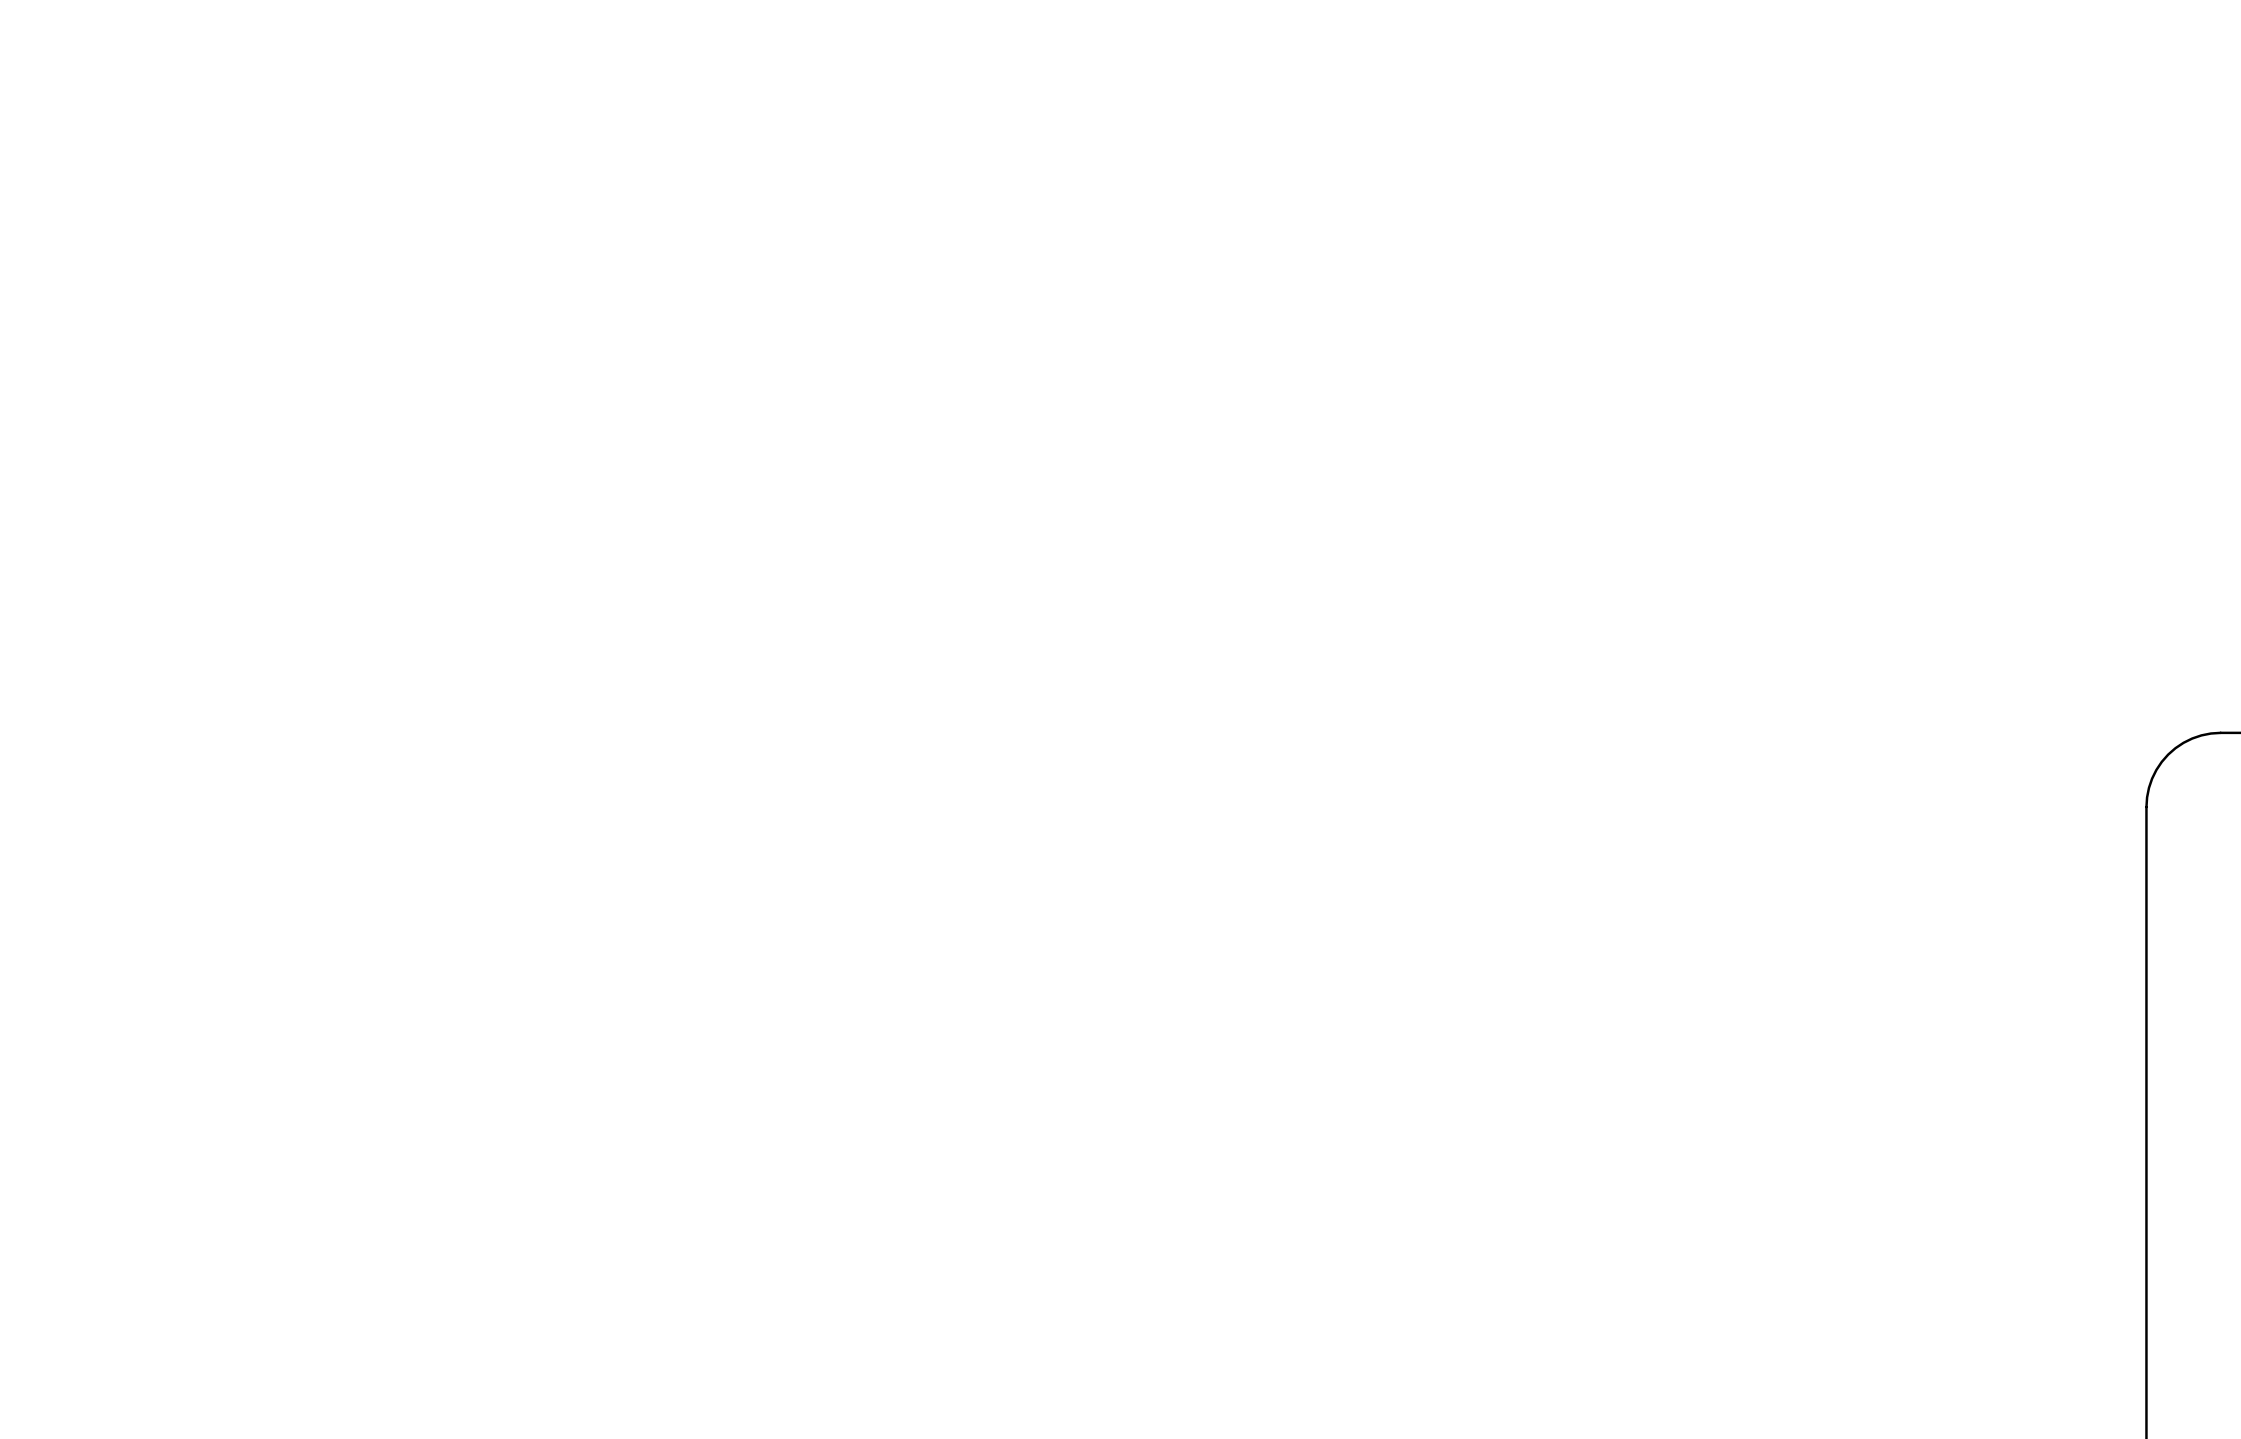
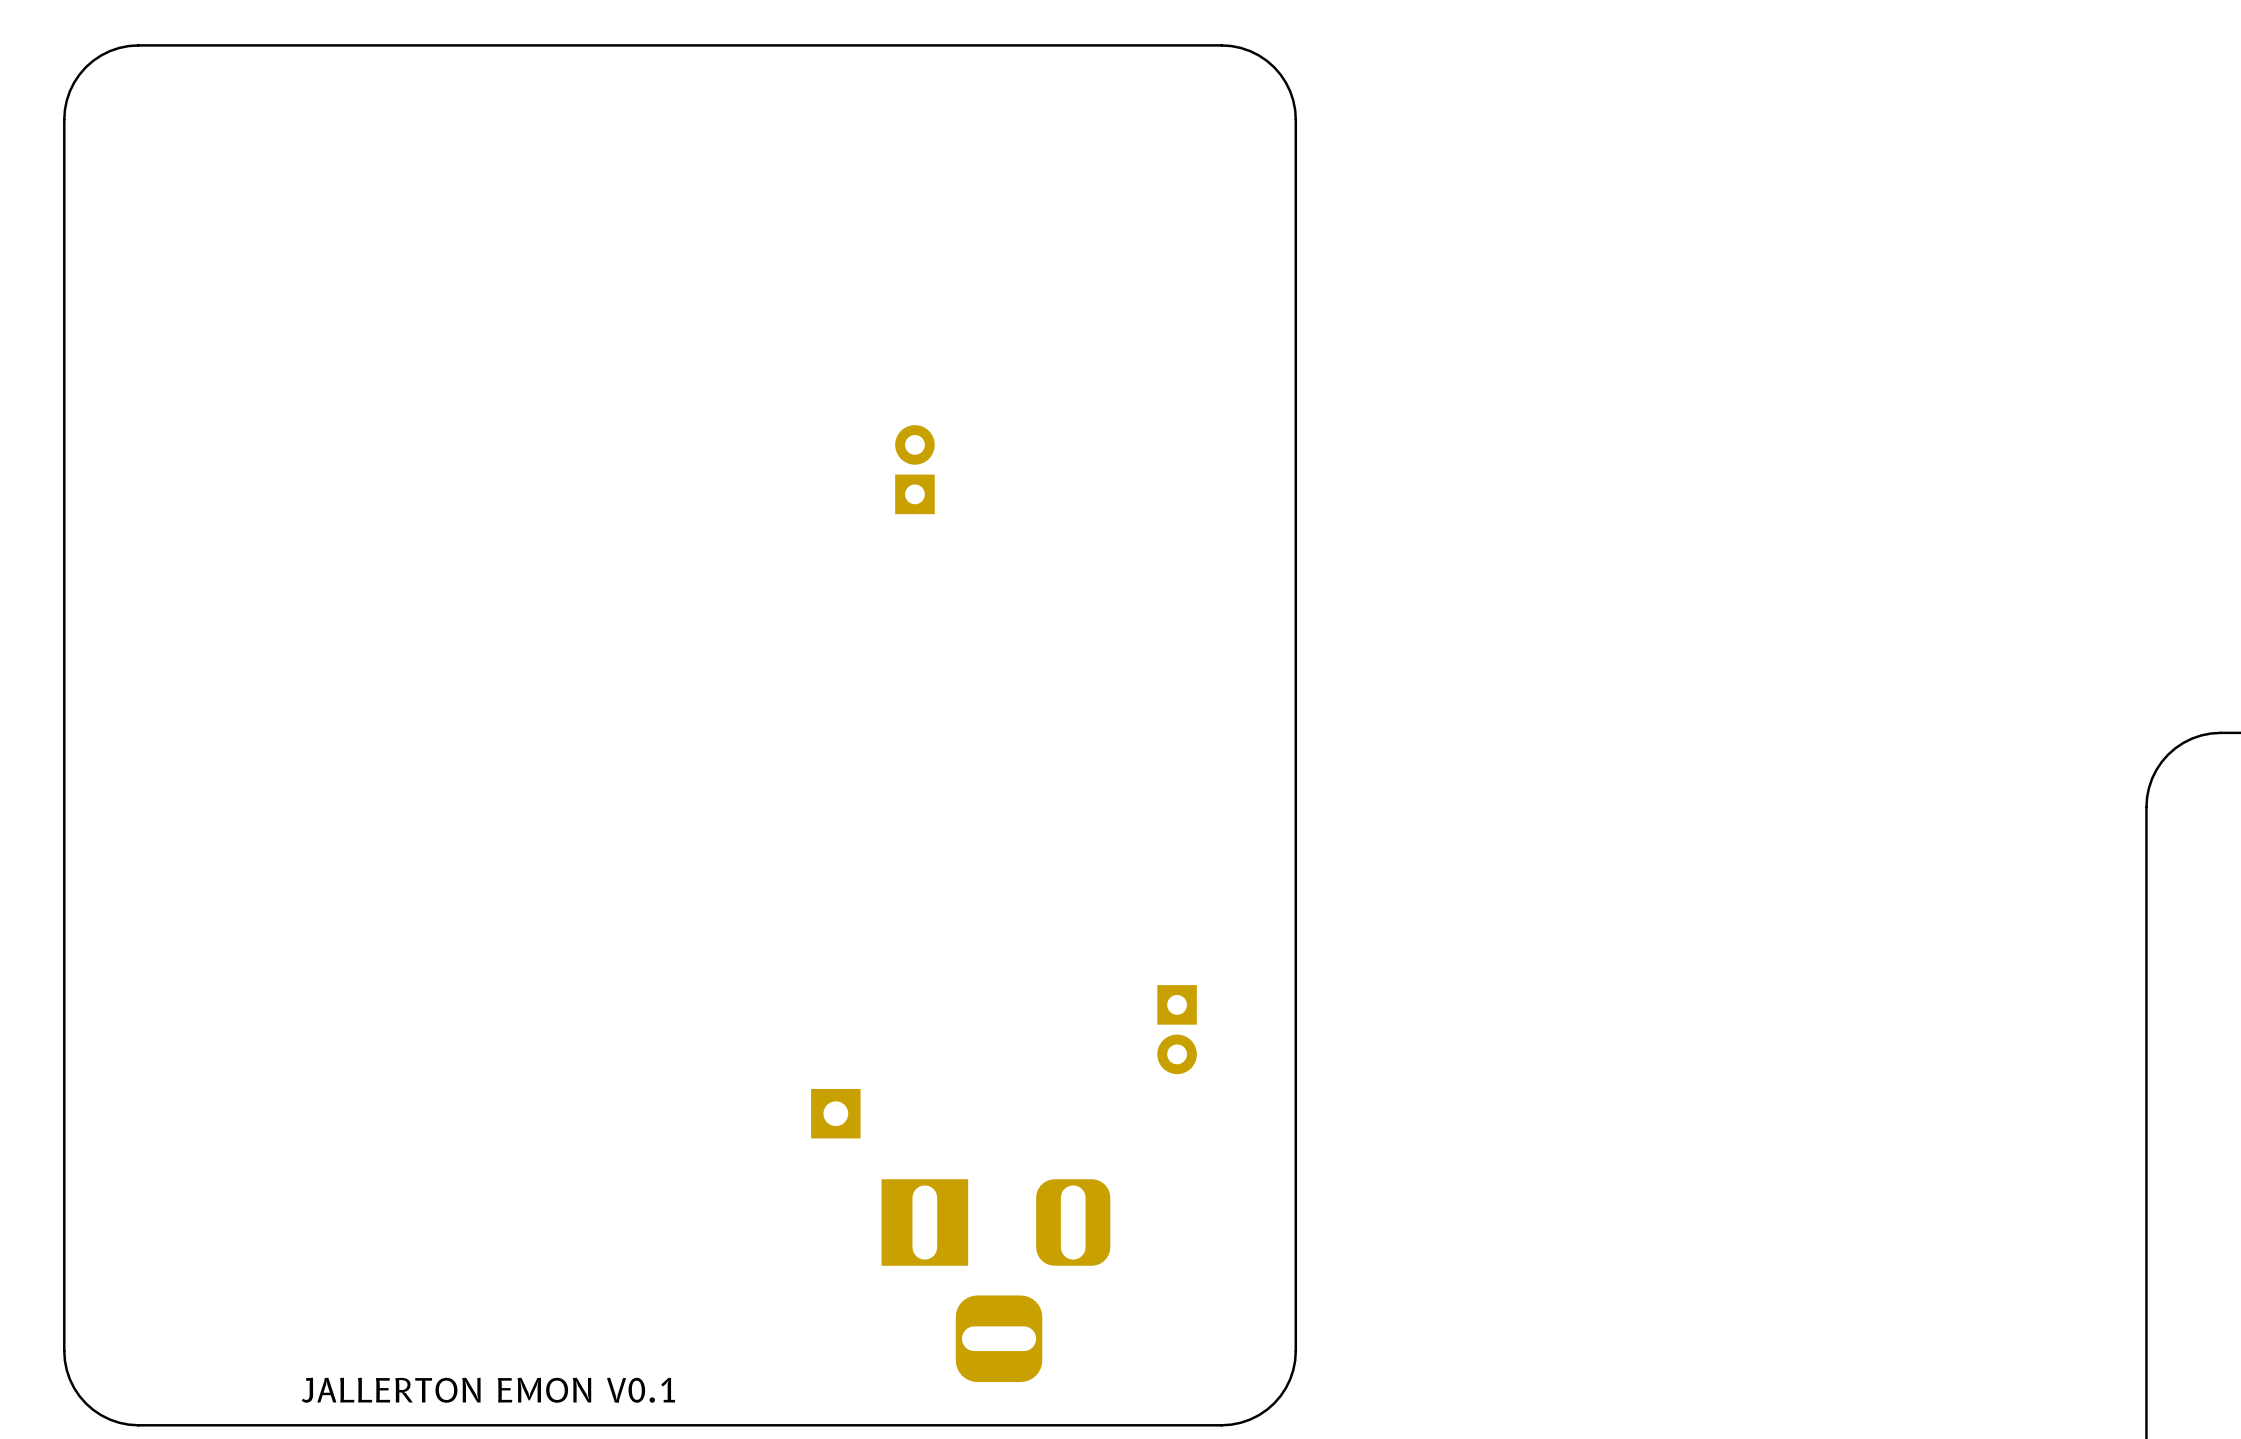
board edge: none -> (1221, 45) (138, 45) (110, 51) (93, 60) (79, 74) (69, 91) (64, 119) (64, 1351) (66, 1370) (74, 1388) (93, 1409) (110, 1419) (138, 1425) (1221, 1425) (1249, 1419) (1266, 1409) (1280, 1396) (1290, 1379) (1295, 1351) (1295, 119) (1290, 91) (1274, 67) (1249, 51) (1221, 45)
part: none -> (914, 469)
part: none -> (1177, 1029)
part: none -> (835, 1113)
part: none -> (995, 1280)
text: none -> JALLERTON EMON V0.1 (488, 1390)

